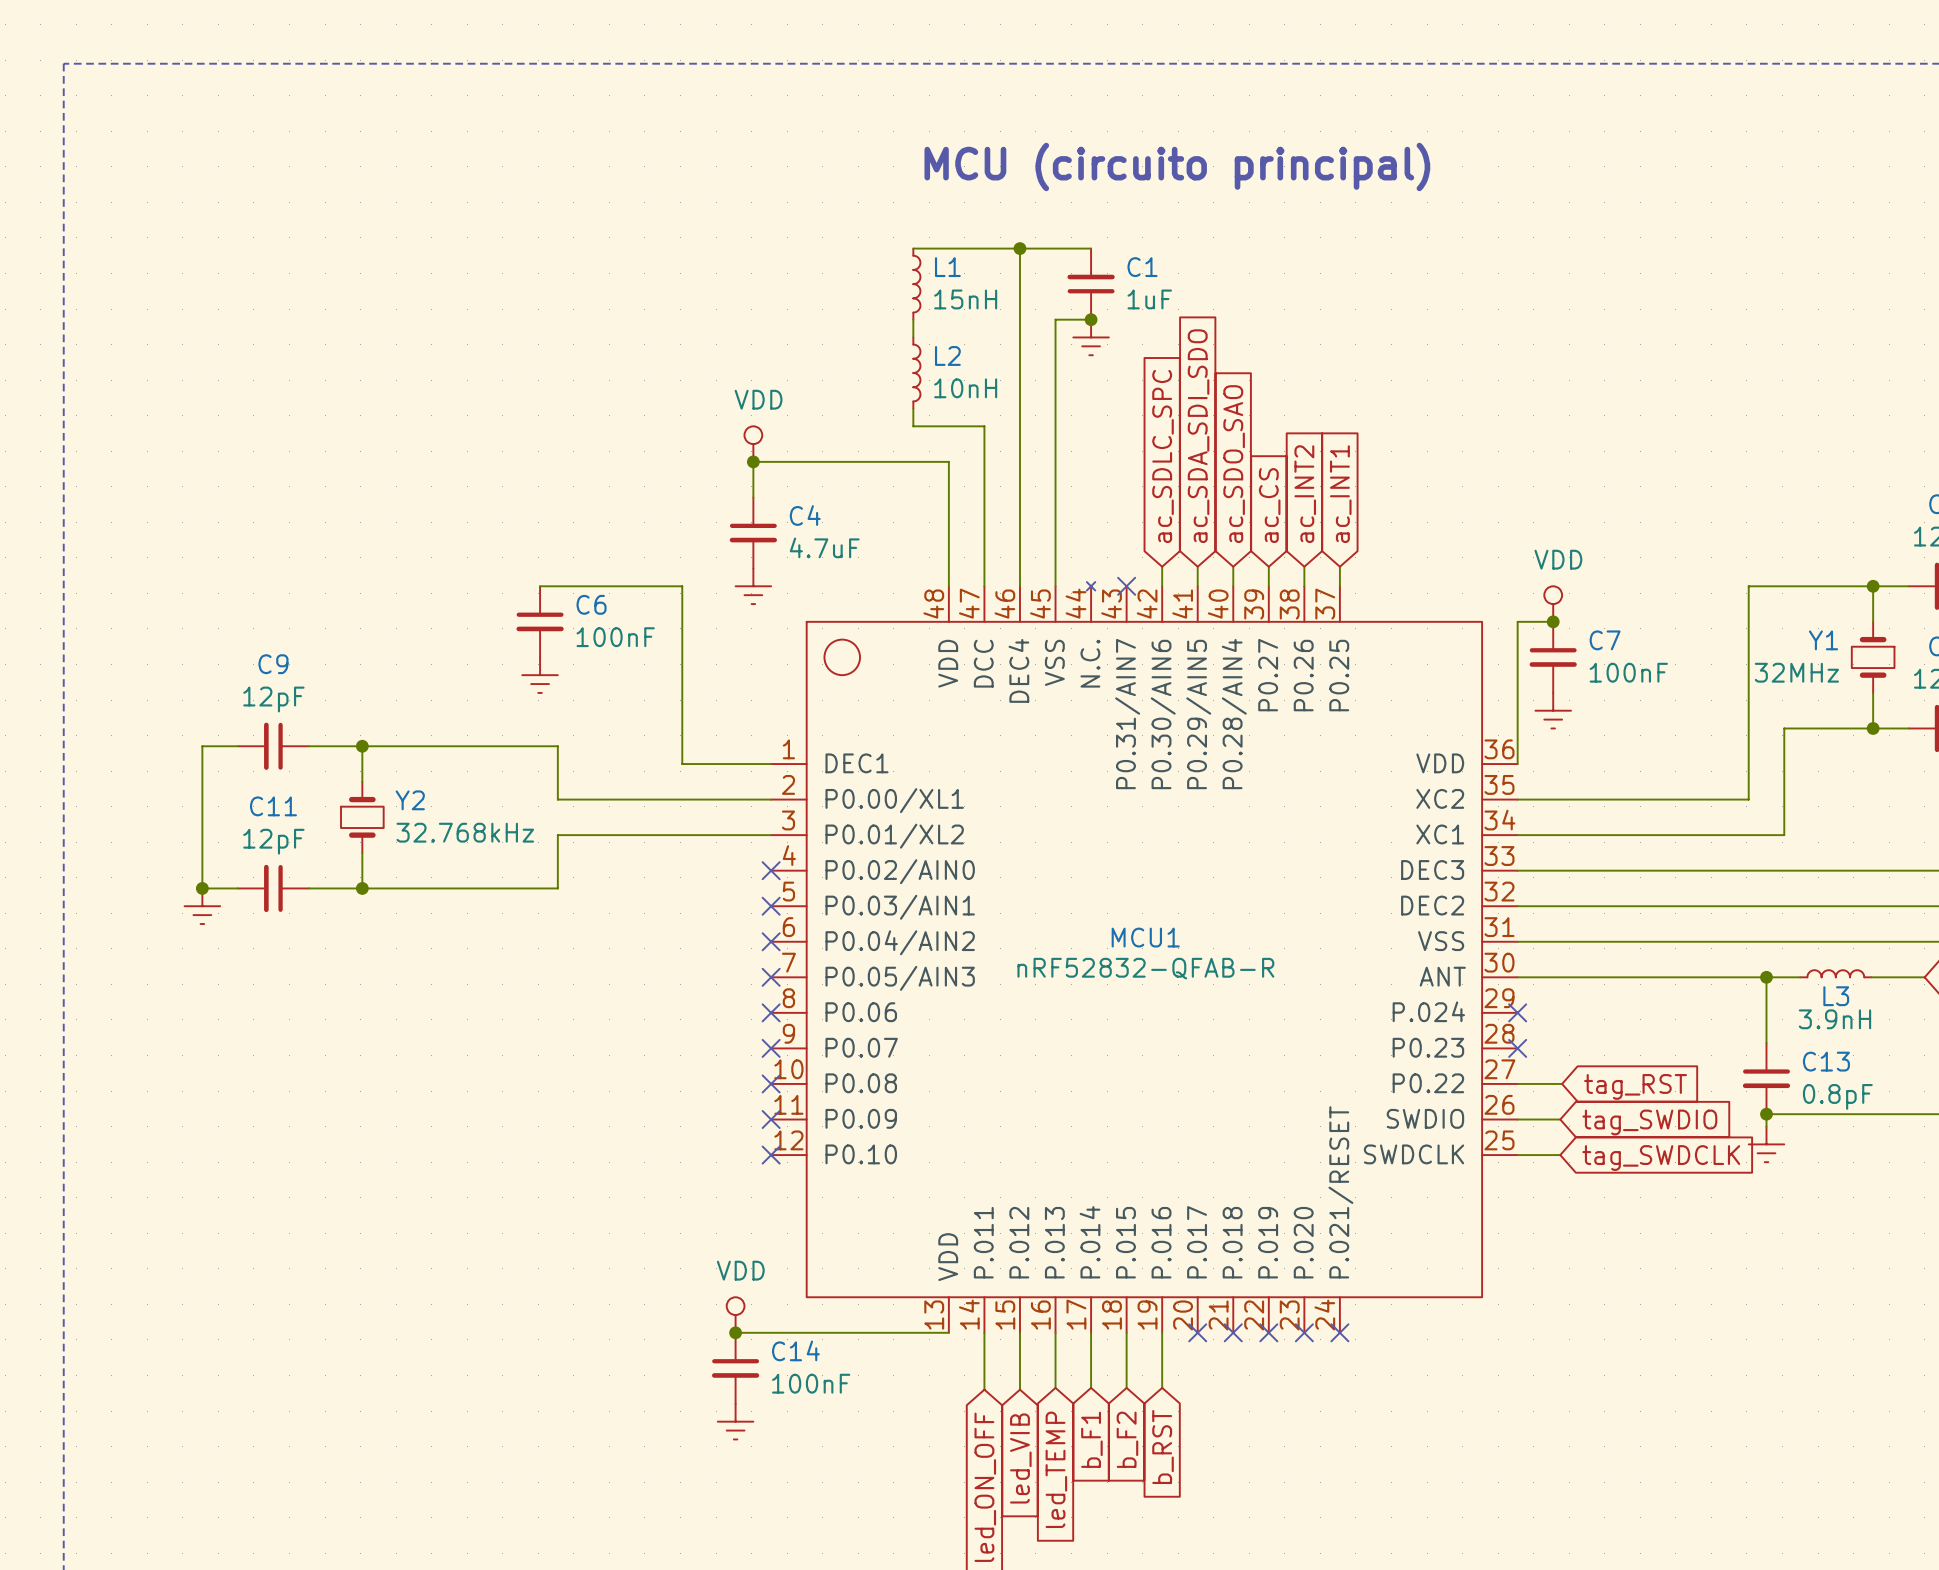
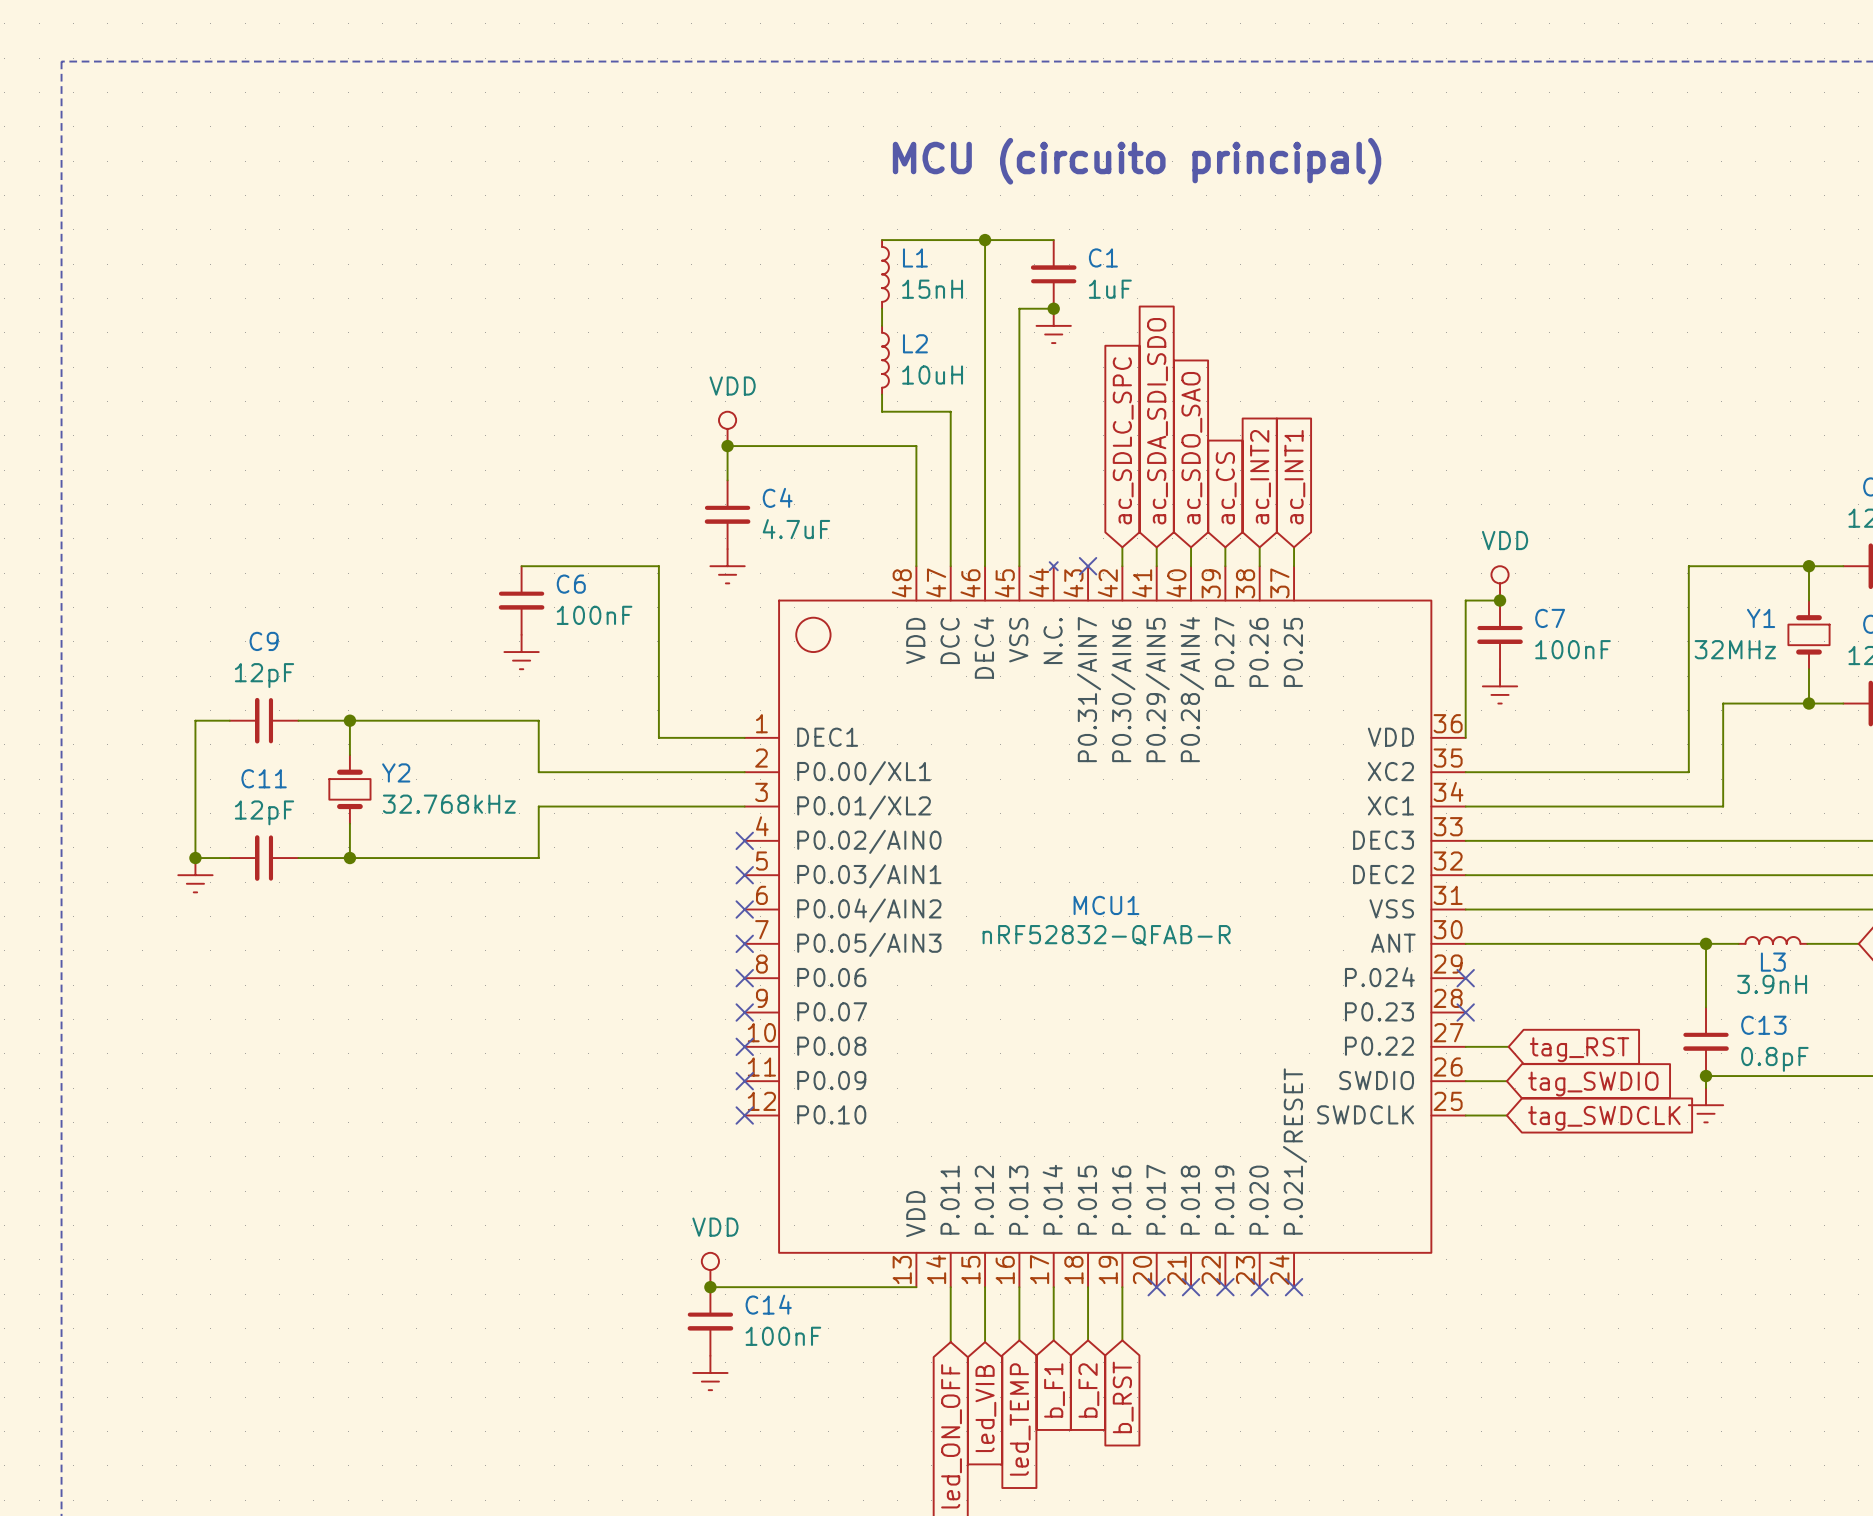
L2 value: 10nH (965, 388) -> 10uH (932, 375)

